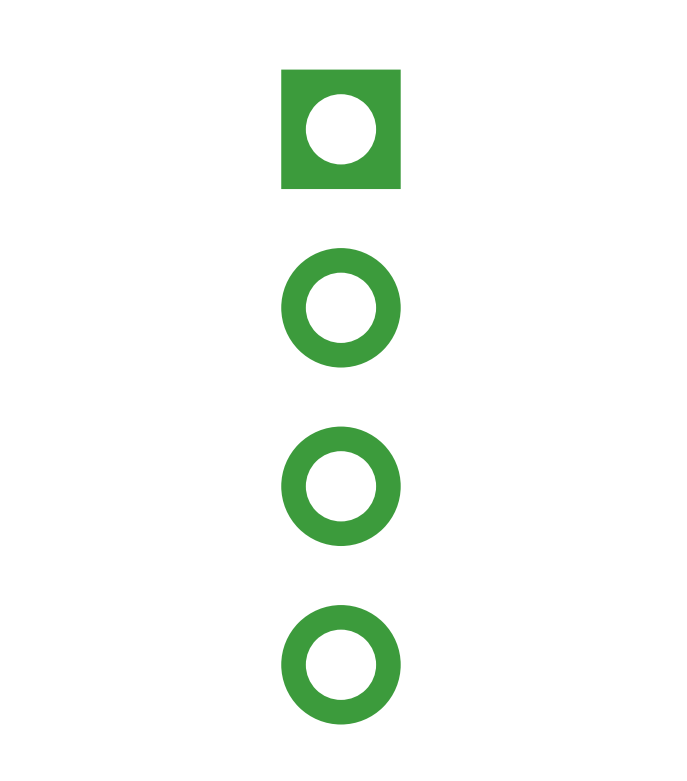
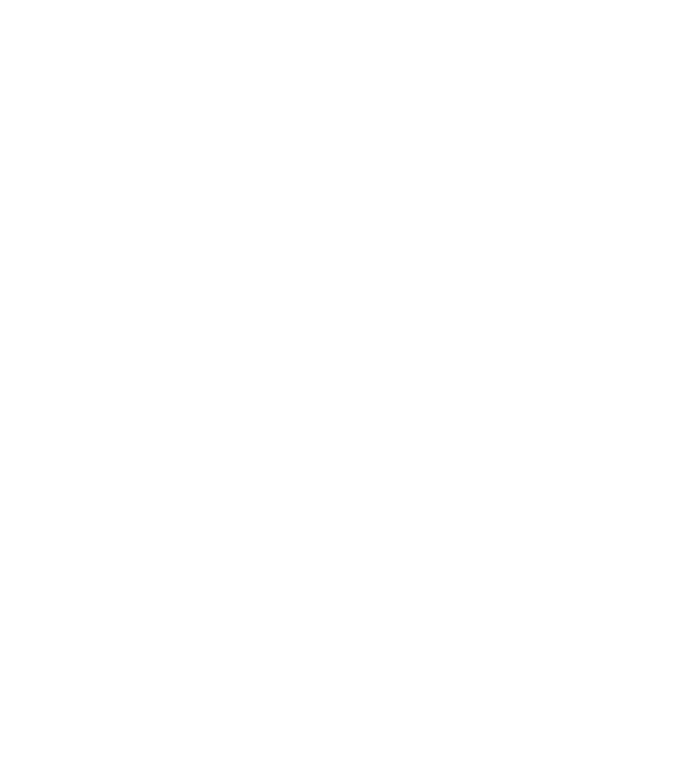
part: (340, 397) -> none

